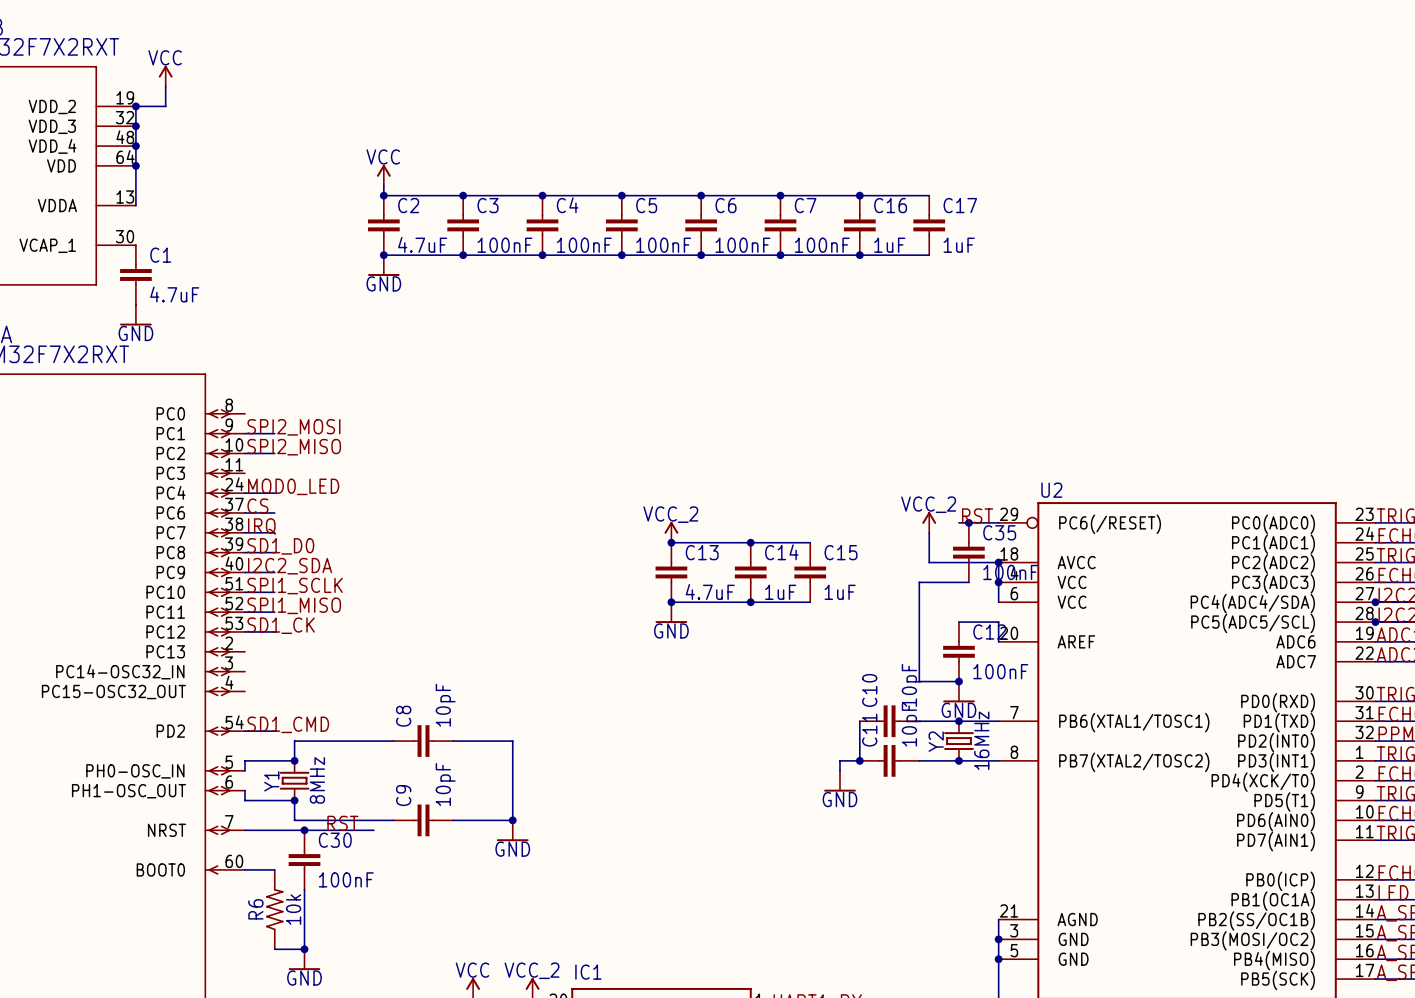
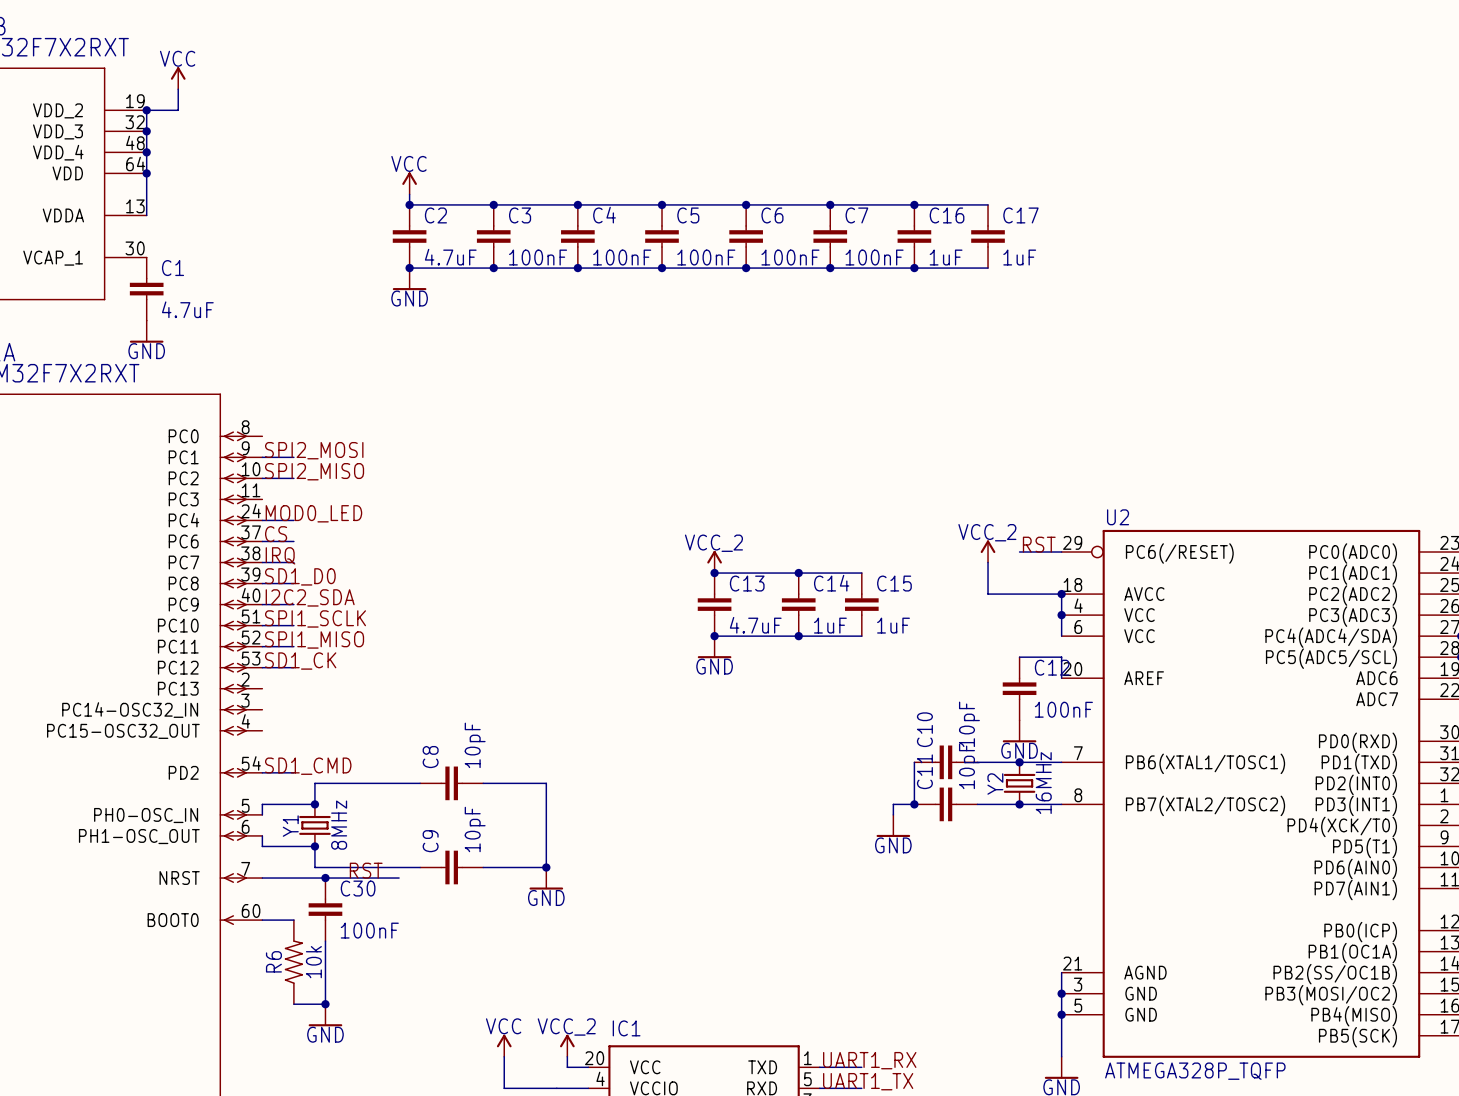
junction: (968, 522) -> none
C35: 100nF (968, 552) -> none
wire: (968, 582) (919, 582) (919, 681) (958, 681) -> none
junction: (958, 681) -> none

